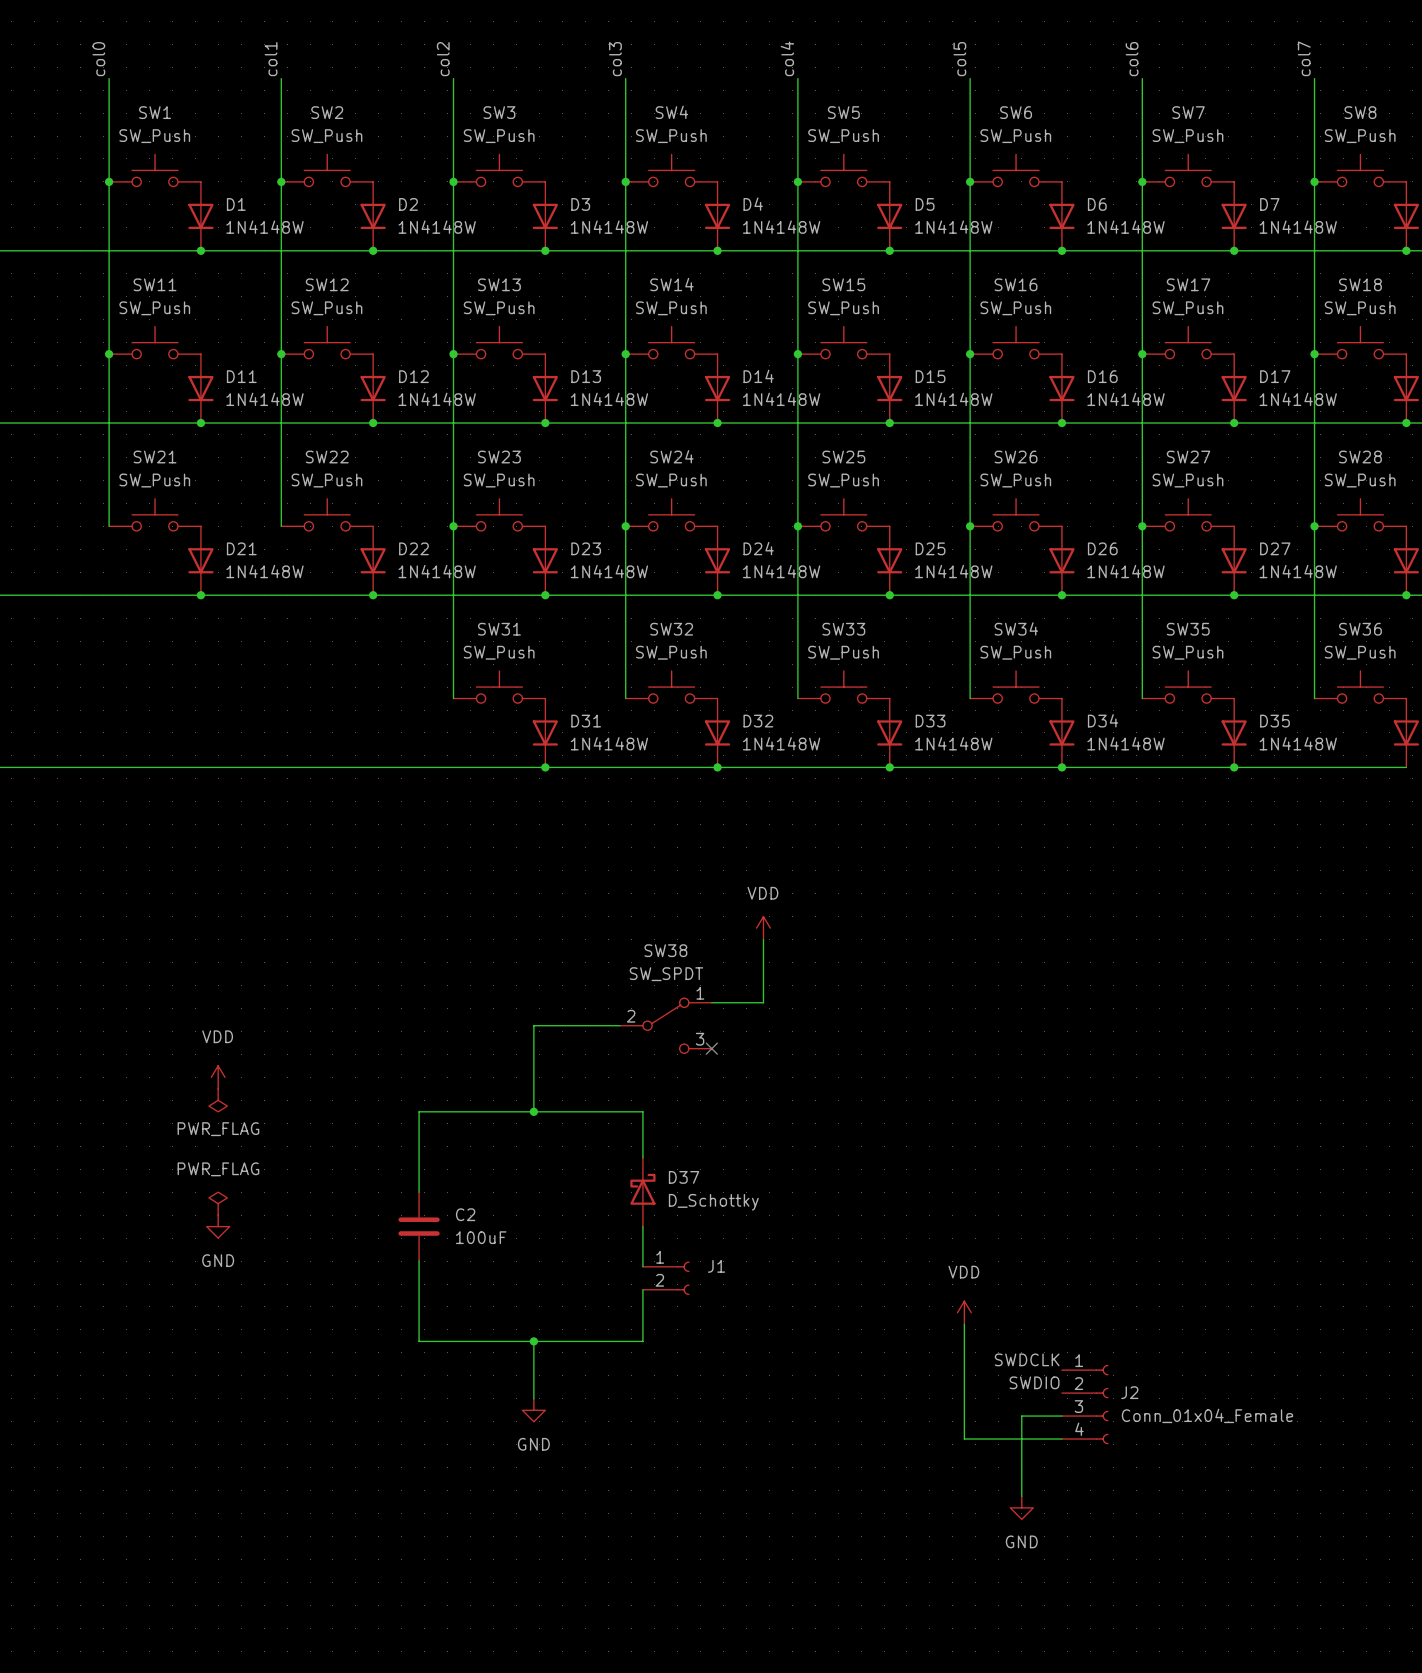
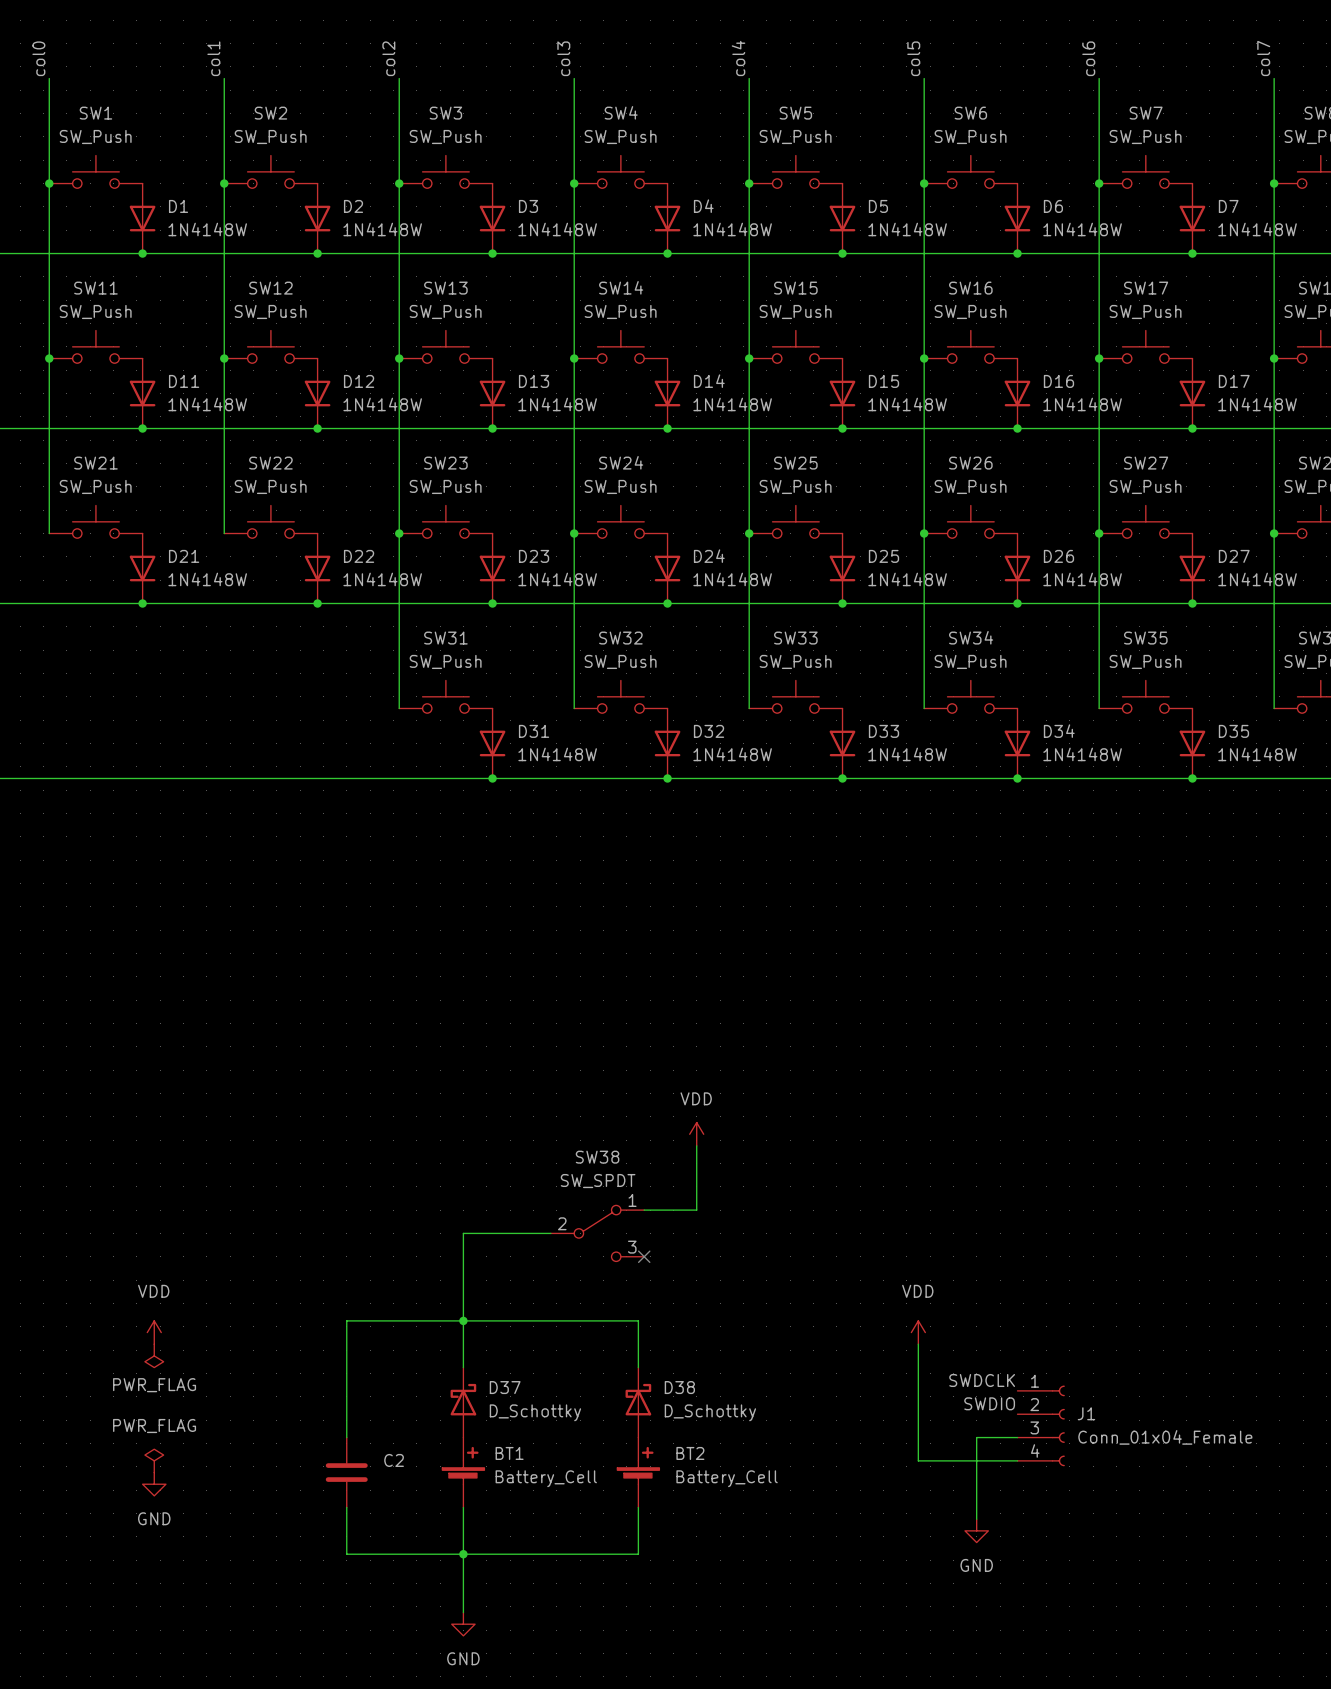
power symbol position: VDD (763, 928) -> VDD (696, 1134)
wire: (763, 939) (763, 1002) (711, 1002) -> (696, 1145) (696, 1210) (644, 1210)
wire: (619, 1025) (533, 1025) (533, 1111) -> none
SW38 position: (665, 1025) -> (597, 1233)
no-connect mark: (711, 1048) -> none
power symbol: VDD (218, 1077) -> none
power symbol: PWR_FLAG (218, 1100) -> none
junction: (533, 1111) -> none
wire: (642, 1157) (642, 1111) (419, 1111) (419, 1192) -> none
D37 position: (642, 1192) -> (463, 1402)
power symbol: PWR_FLAG (218, 1203) -> none
wire: none -> (550, 1233) (463, 1233) (463, 1367)
power symbol: GND (218, 1226) -> none
C2 position: (419, 1226) -> (346, 1472)
wire: (642, 1226) (642, 1266) -> none
C2 value: 100uF (481, 1237) -> none
no-connect mark: none -> (644, 1256)
wire: (419, 1261) (419, 1341) (642, 1341) (642, 1289) -> none
J1: (666, 1278) -> none
power symbol: none -> VDD (154, 1332)
power symbol: none -> PWR_FLAG (154, 1355)
wire: (533, 1341) (533, 1398) -> none
junction position: (533, 1341) -> (463, 1320)
wire: none -> (638, 1367) (638, 1320) (346, 1320) (346, 1437)
D38: none -> D_Schottky (638, 1402)
J2 name: J2 (1129, 1392) -> J1 (1086, 1413)
power symbol: GND (533, 1410) -> none
power symbol: none -> PWR_FLAG (154, 1460)
BT1: none -> Battery_Cell (463, 1472)
BT2: none -> Battery_Cell (638, 1472)
power symbol: none -> GND (154, 1484)
wire: none -> (346, 1507) (346, 1554) (638, 1554) (638, 1507)
wire: none -> (463, 1507) (463, 1612)
junction: none -> (463, 1554)
power symbol: none -> GND (463, 1624)

